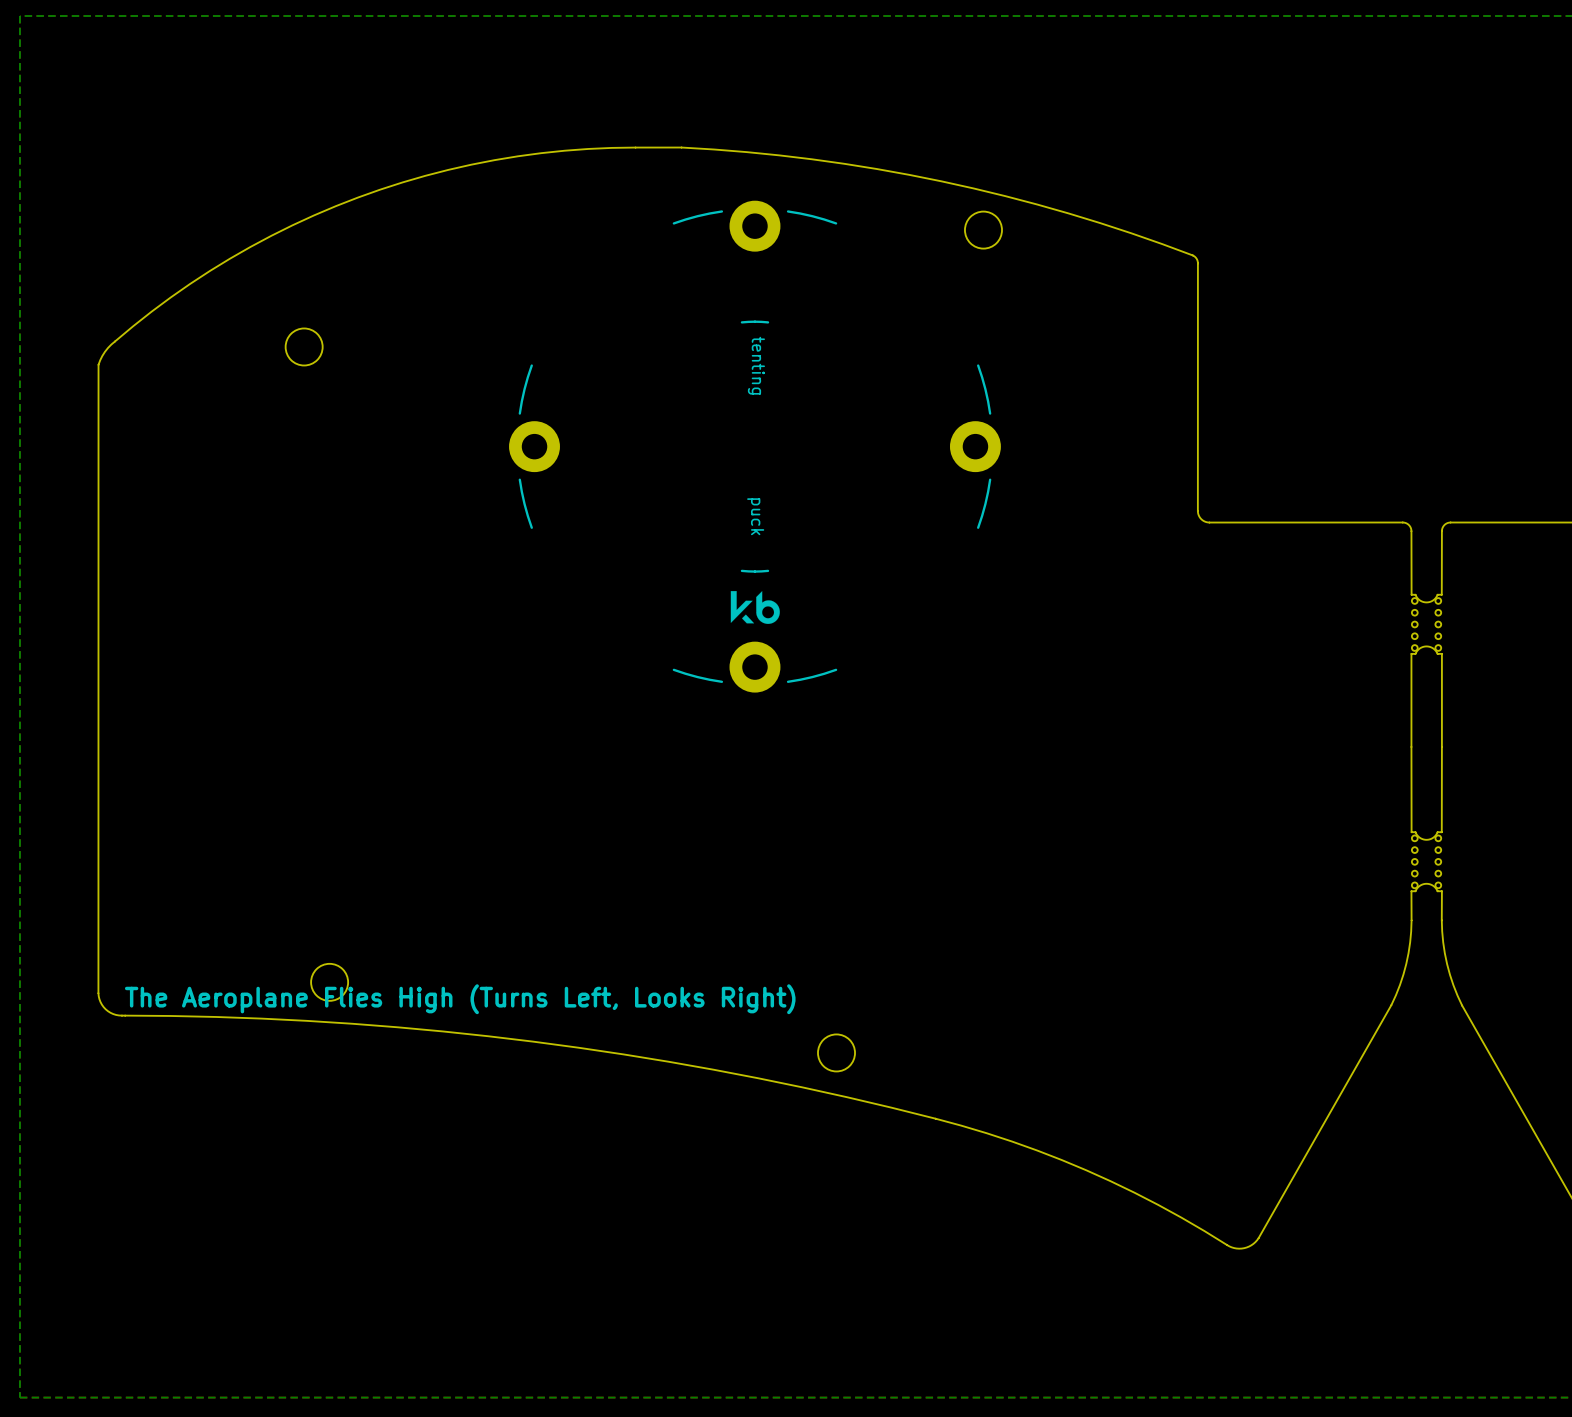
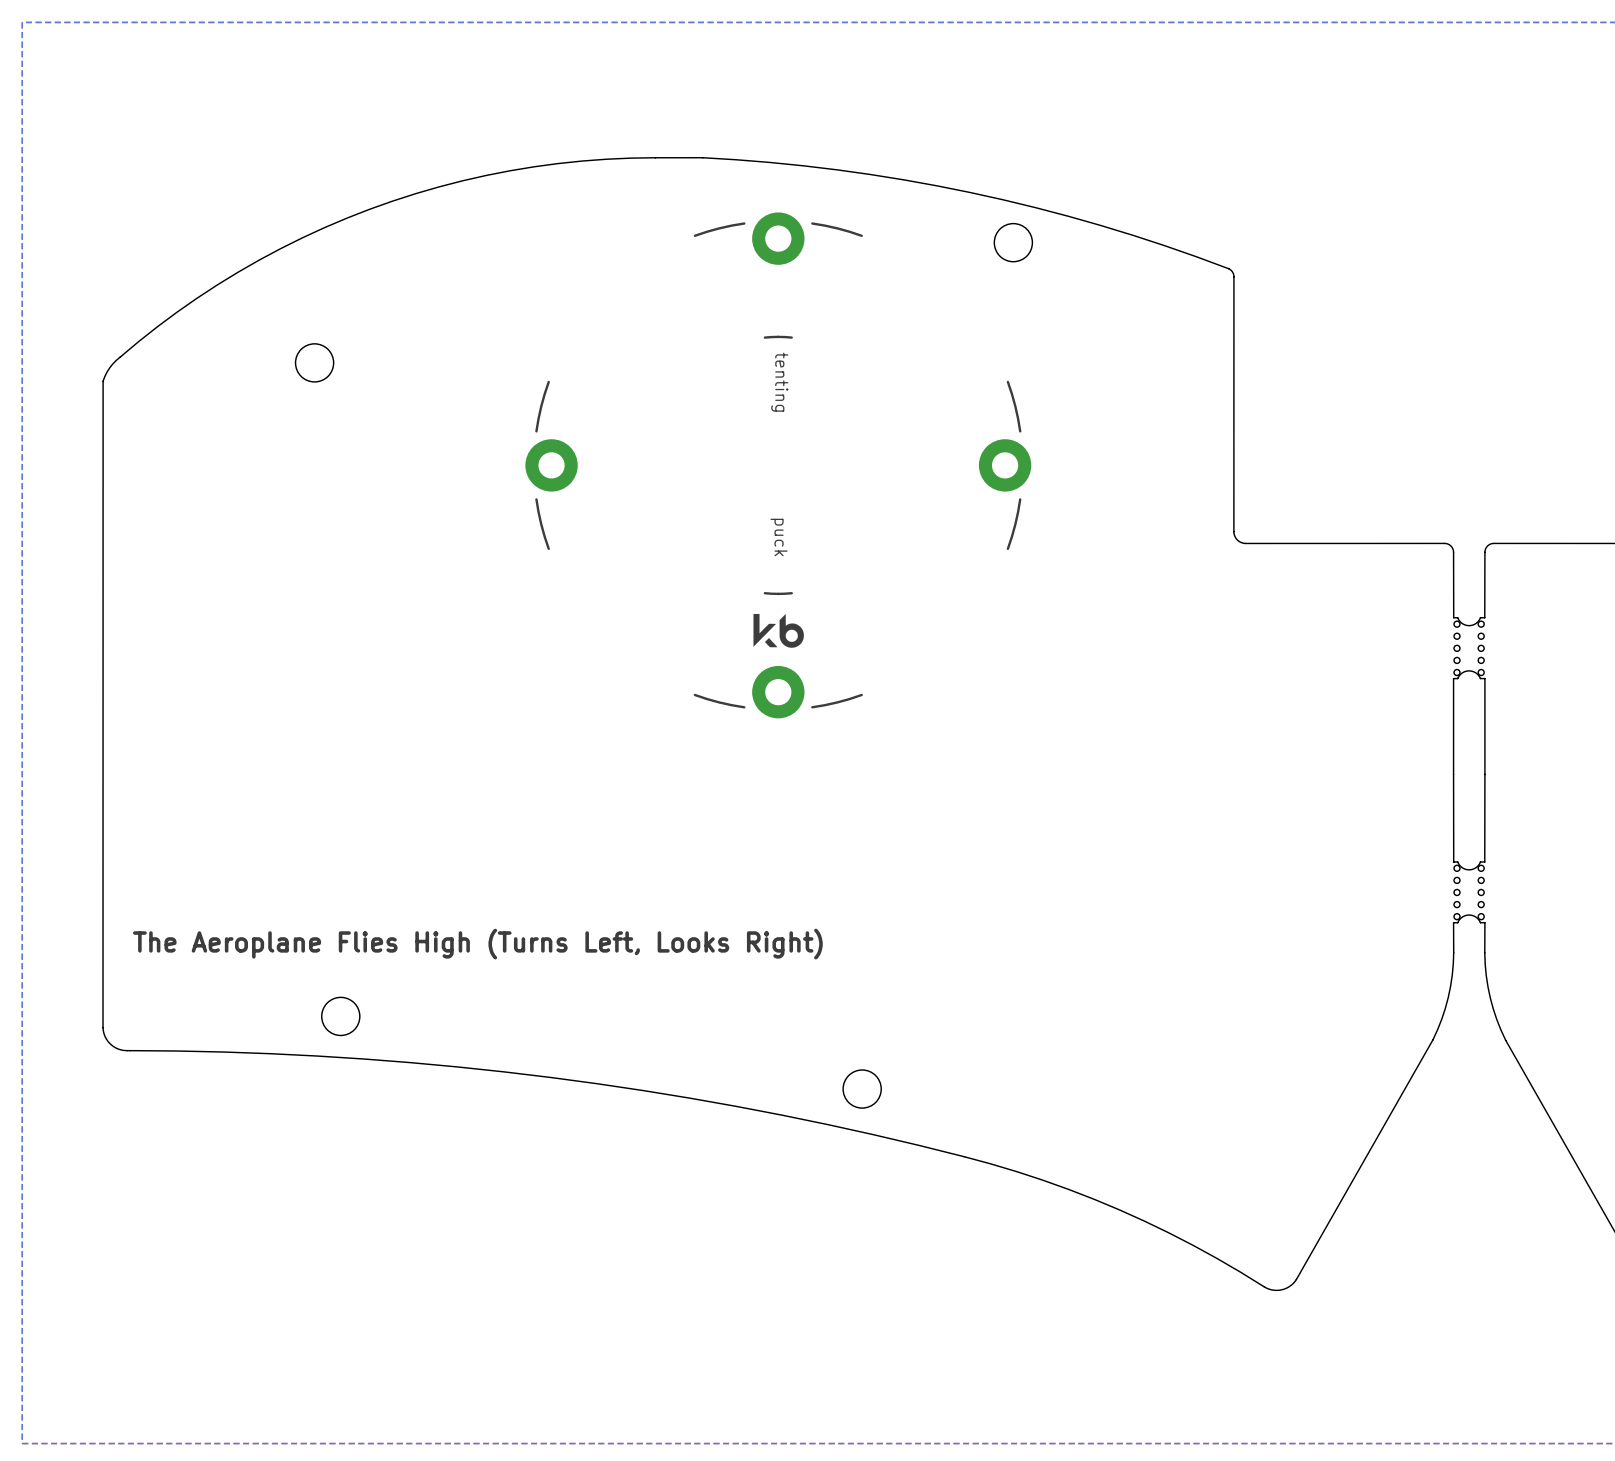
text position: The Aeroplane Flies High (Turns Left, Looks Right) (460, 999) -> The Aeroplane Flies High (Turns Left, Looks Right) (477, 944)

